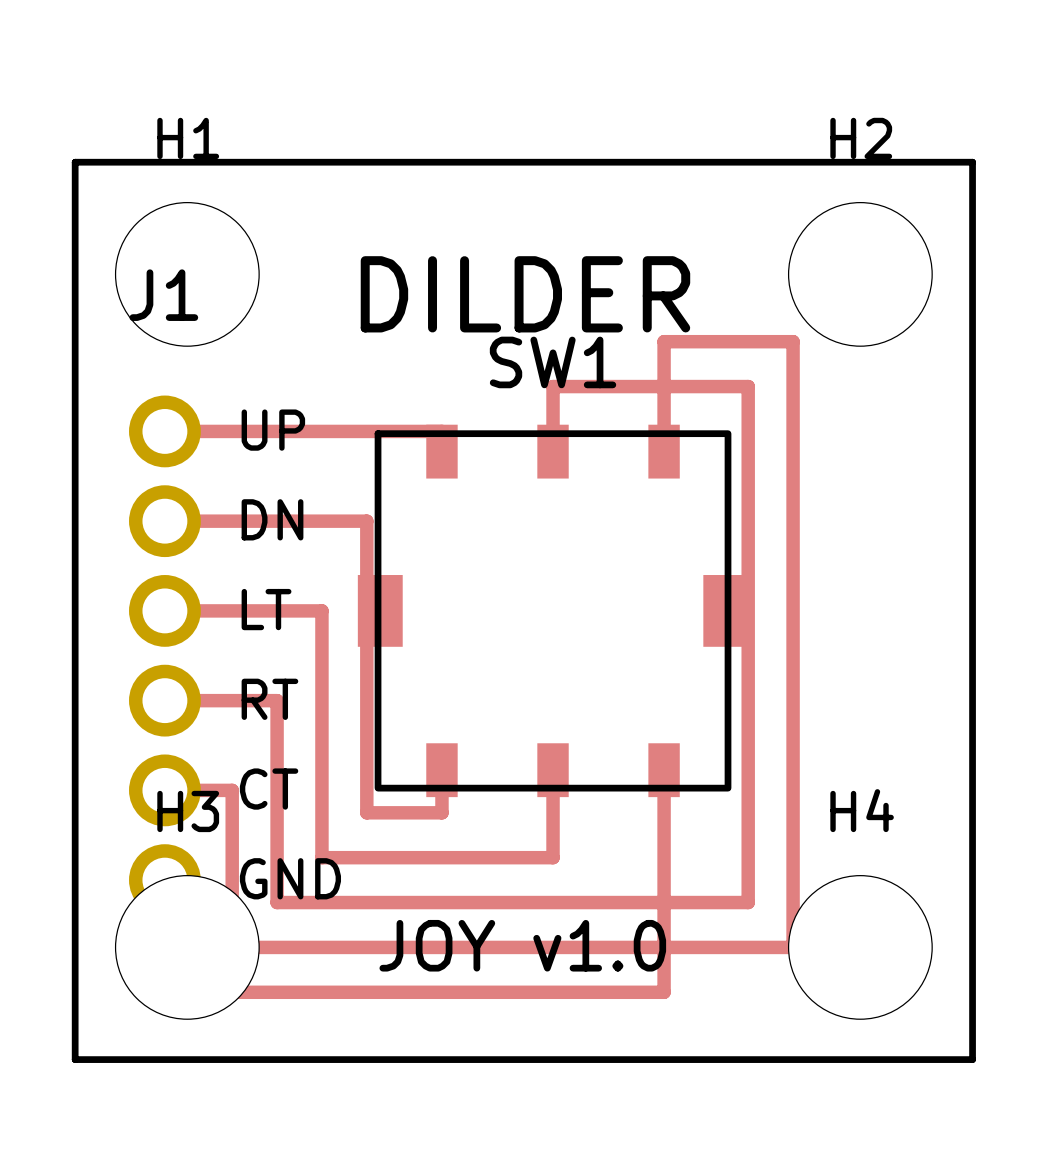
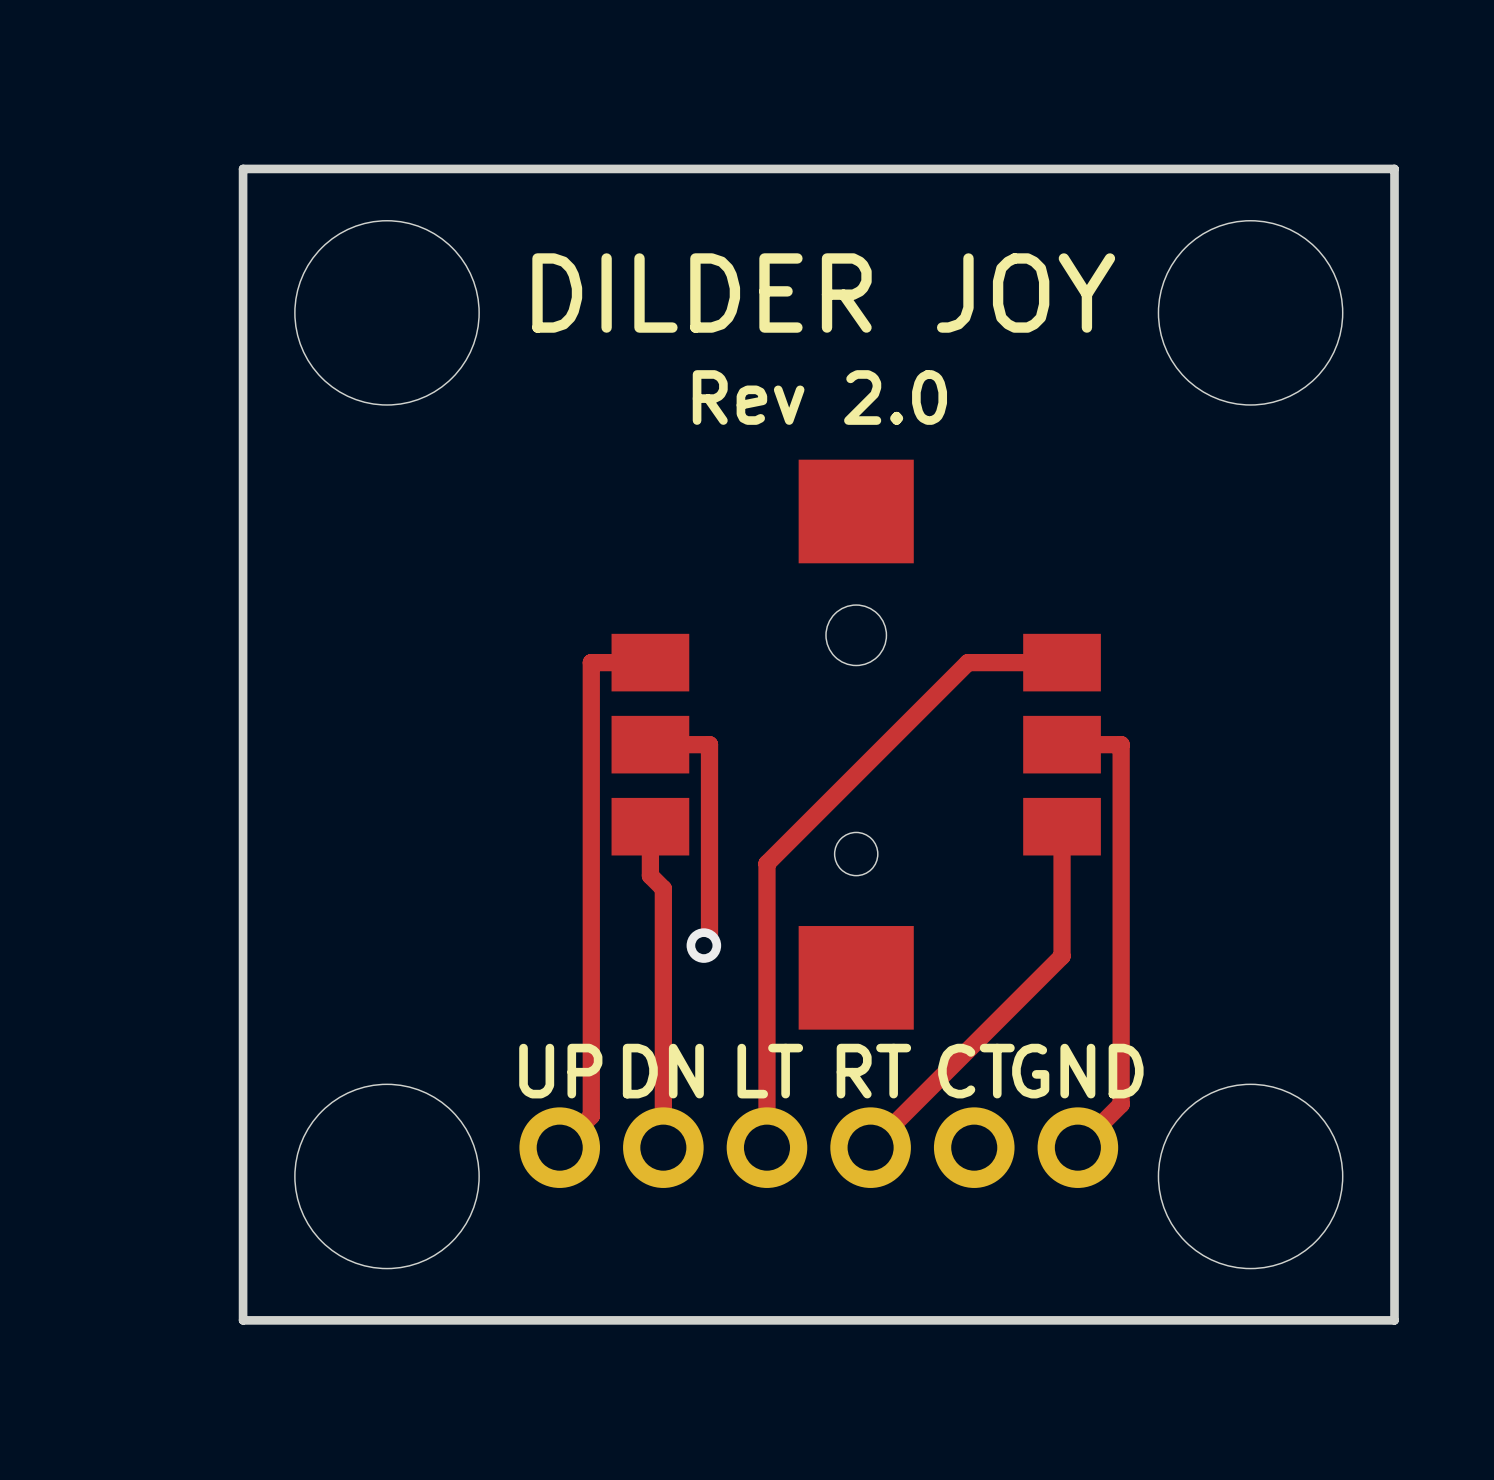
H1 name: H1 (188, 138) -> none
H2 name: H2 (861, 138) -> none
text: DILDER (525, 294) -> DILDER JOY (823, 293)
text: none -> Rev 2.0 (819, 397)
text position: UP (273, 430) -> UP (560, 1071)
track: (164, 431) (441, 431) (441, 451) -> none
track: (553, 451) (553, 386) (748, 386) (748, 902) (277, 902) (277, 700) (164, 700) -> none
track: (664, 451) (664, 341) (793, 341) (793, 947) (232, 947) (232, 790) (164, 790) -> none
text position: DN (272, 519) -> DN (663, 1071)
track: (164, 521) (366, 521) (366, 812) (441, 812) (441, 770) -> none
track: none -> (650, 662) (591, 662) (591, 1116) (559, 1147)
track: none -> (1062, 662) (967, 662) (766, 863) (766, 1147)
text position: LT (266, 609) -> LT (770, 1071)
track: (164, 610) (321, 610) (321, 857) (553, 857) (553, 770) -> none
track: none -> (650, 744) (709, 744) (709, 939) (703, 945) (711, 945)
SW1: (553, 610) -> none
part: none -> (856, 744)
track: none -> (1062, 744) (1121, 744) (1121, 1104) (1077, 1147)
J1: (164, 655) -> none
track: none -> (650, 826) (650, 875) (663, 888) (663, 1147)
track: none -> (1062, 826) (1062, 956) (870, 1147)
text position: RT (269, 699) -> RT (873, 1071)
via: none -> (703, 945)
track: (664, 770) (664, 992) (187, 992) (187, 880) (164, 880) -> none
text position: CT (269, 789) -> CT (976, 1071)
H4 name: H4 (862, 810) -> none
H3 name: H3 (188, 811) -> none
text position: GND (290, 878) -> GND (1077, 1071)
part: none -> (818, 1147)
text: JOY v1.0 (522, 945) -> none

